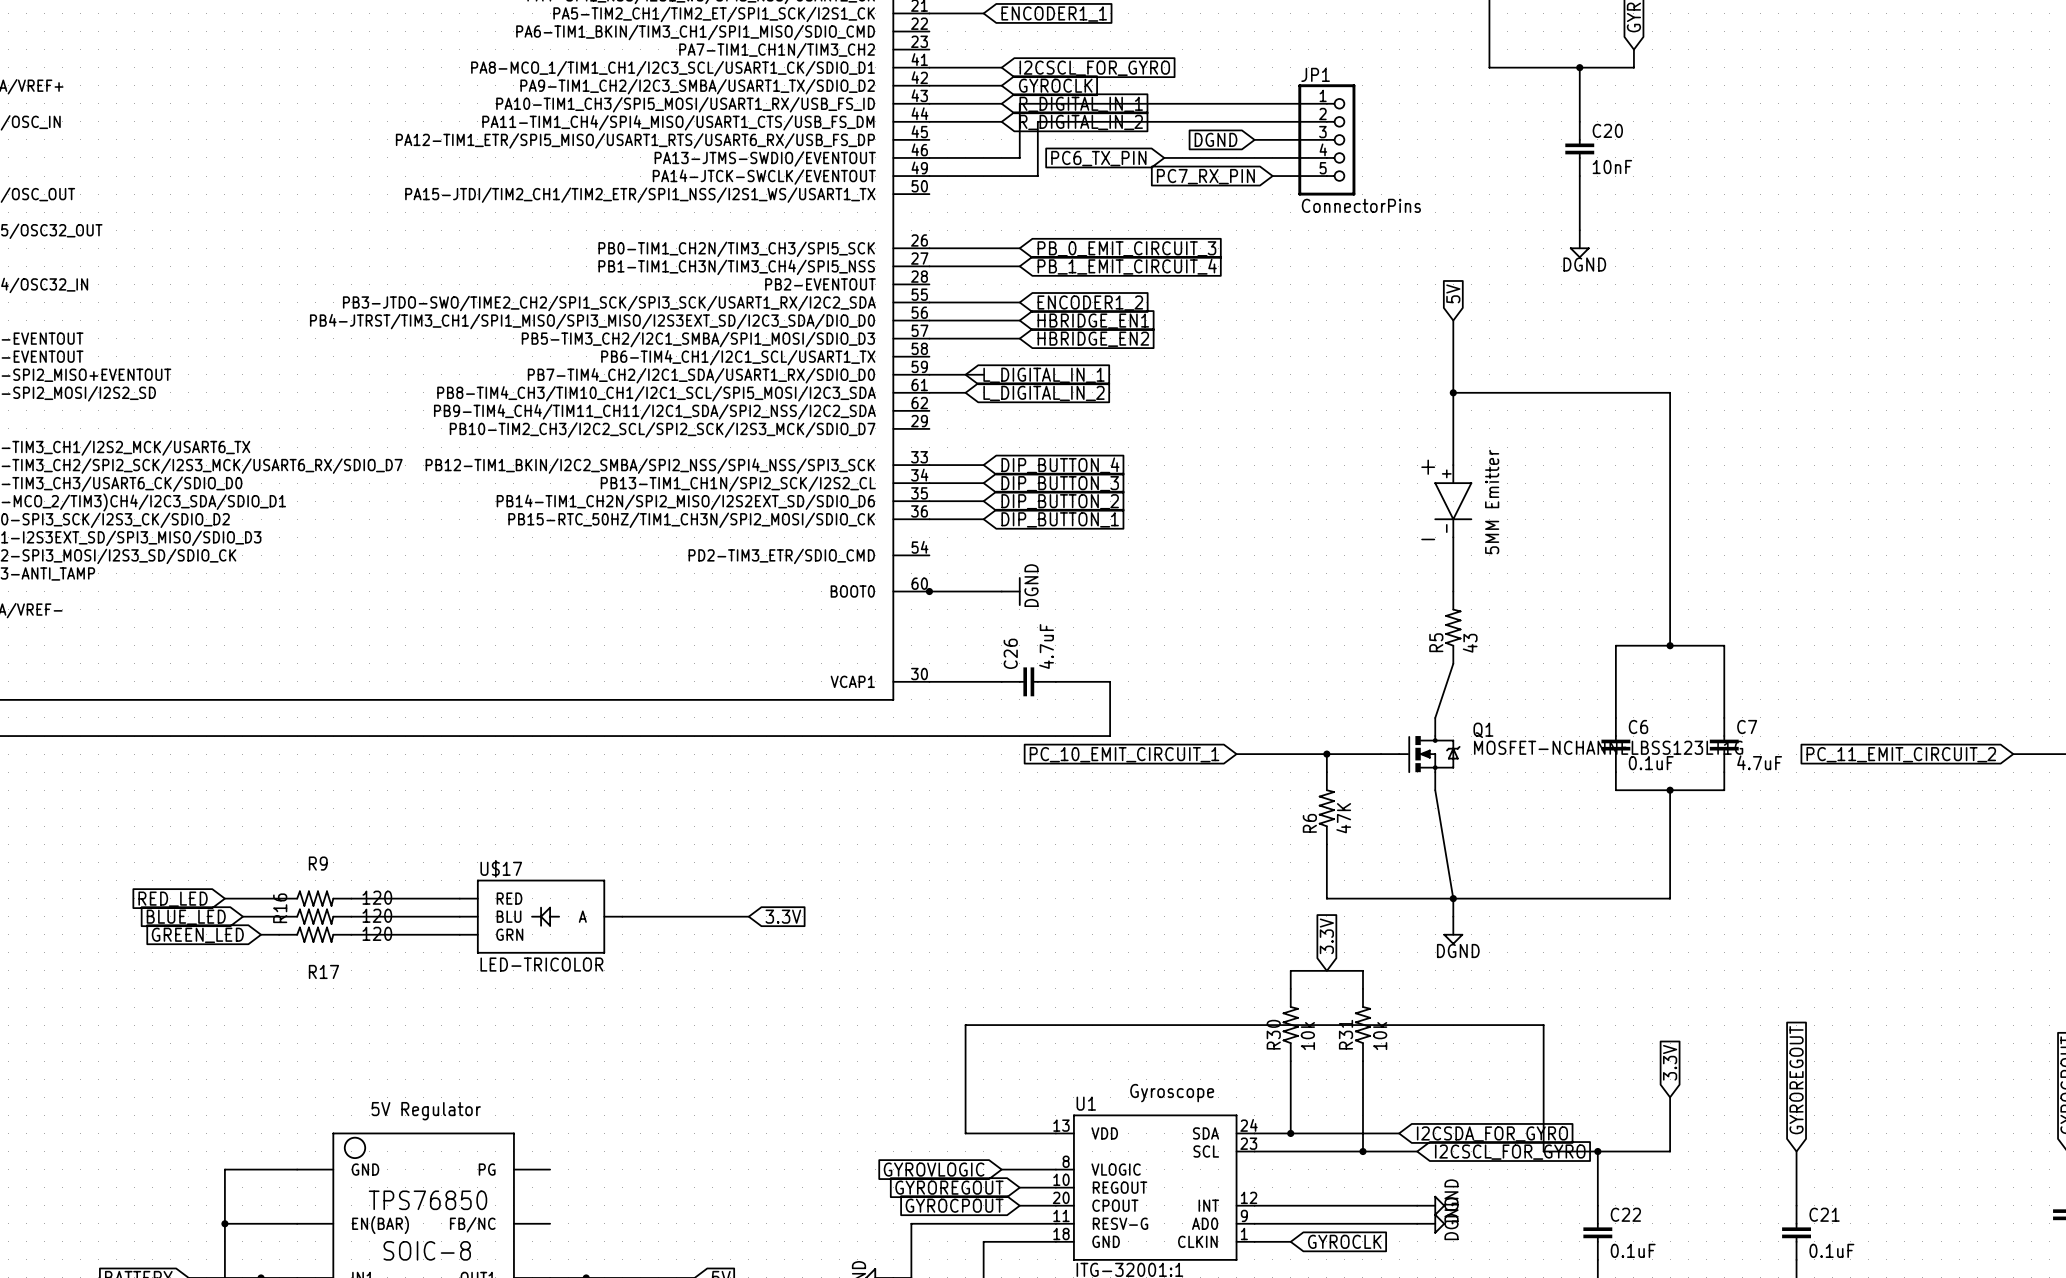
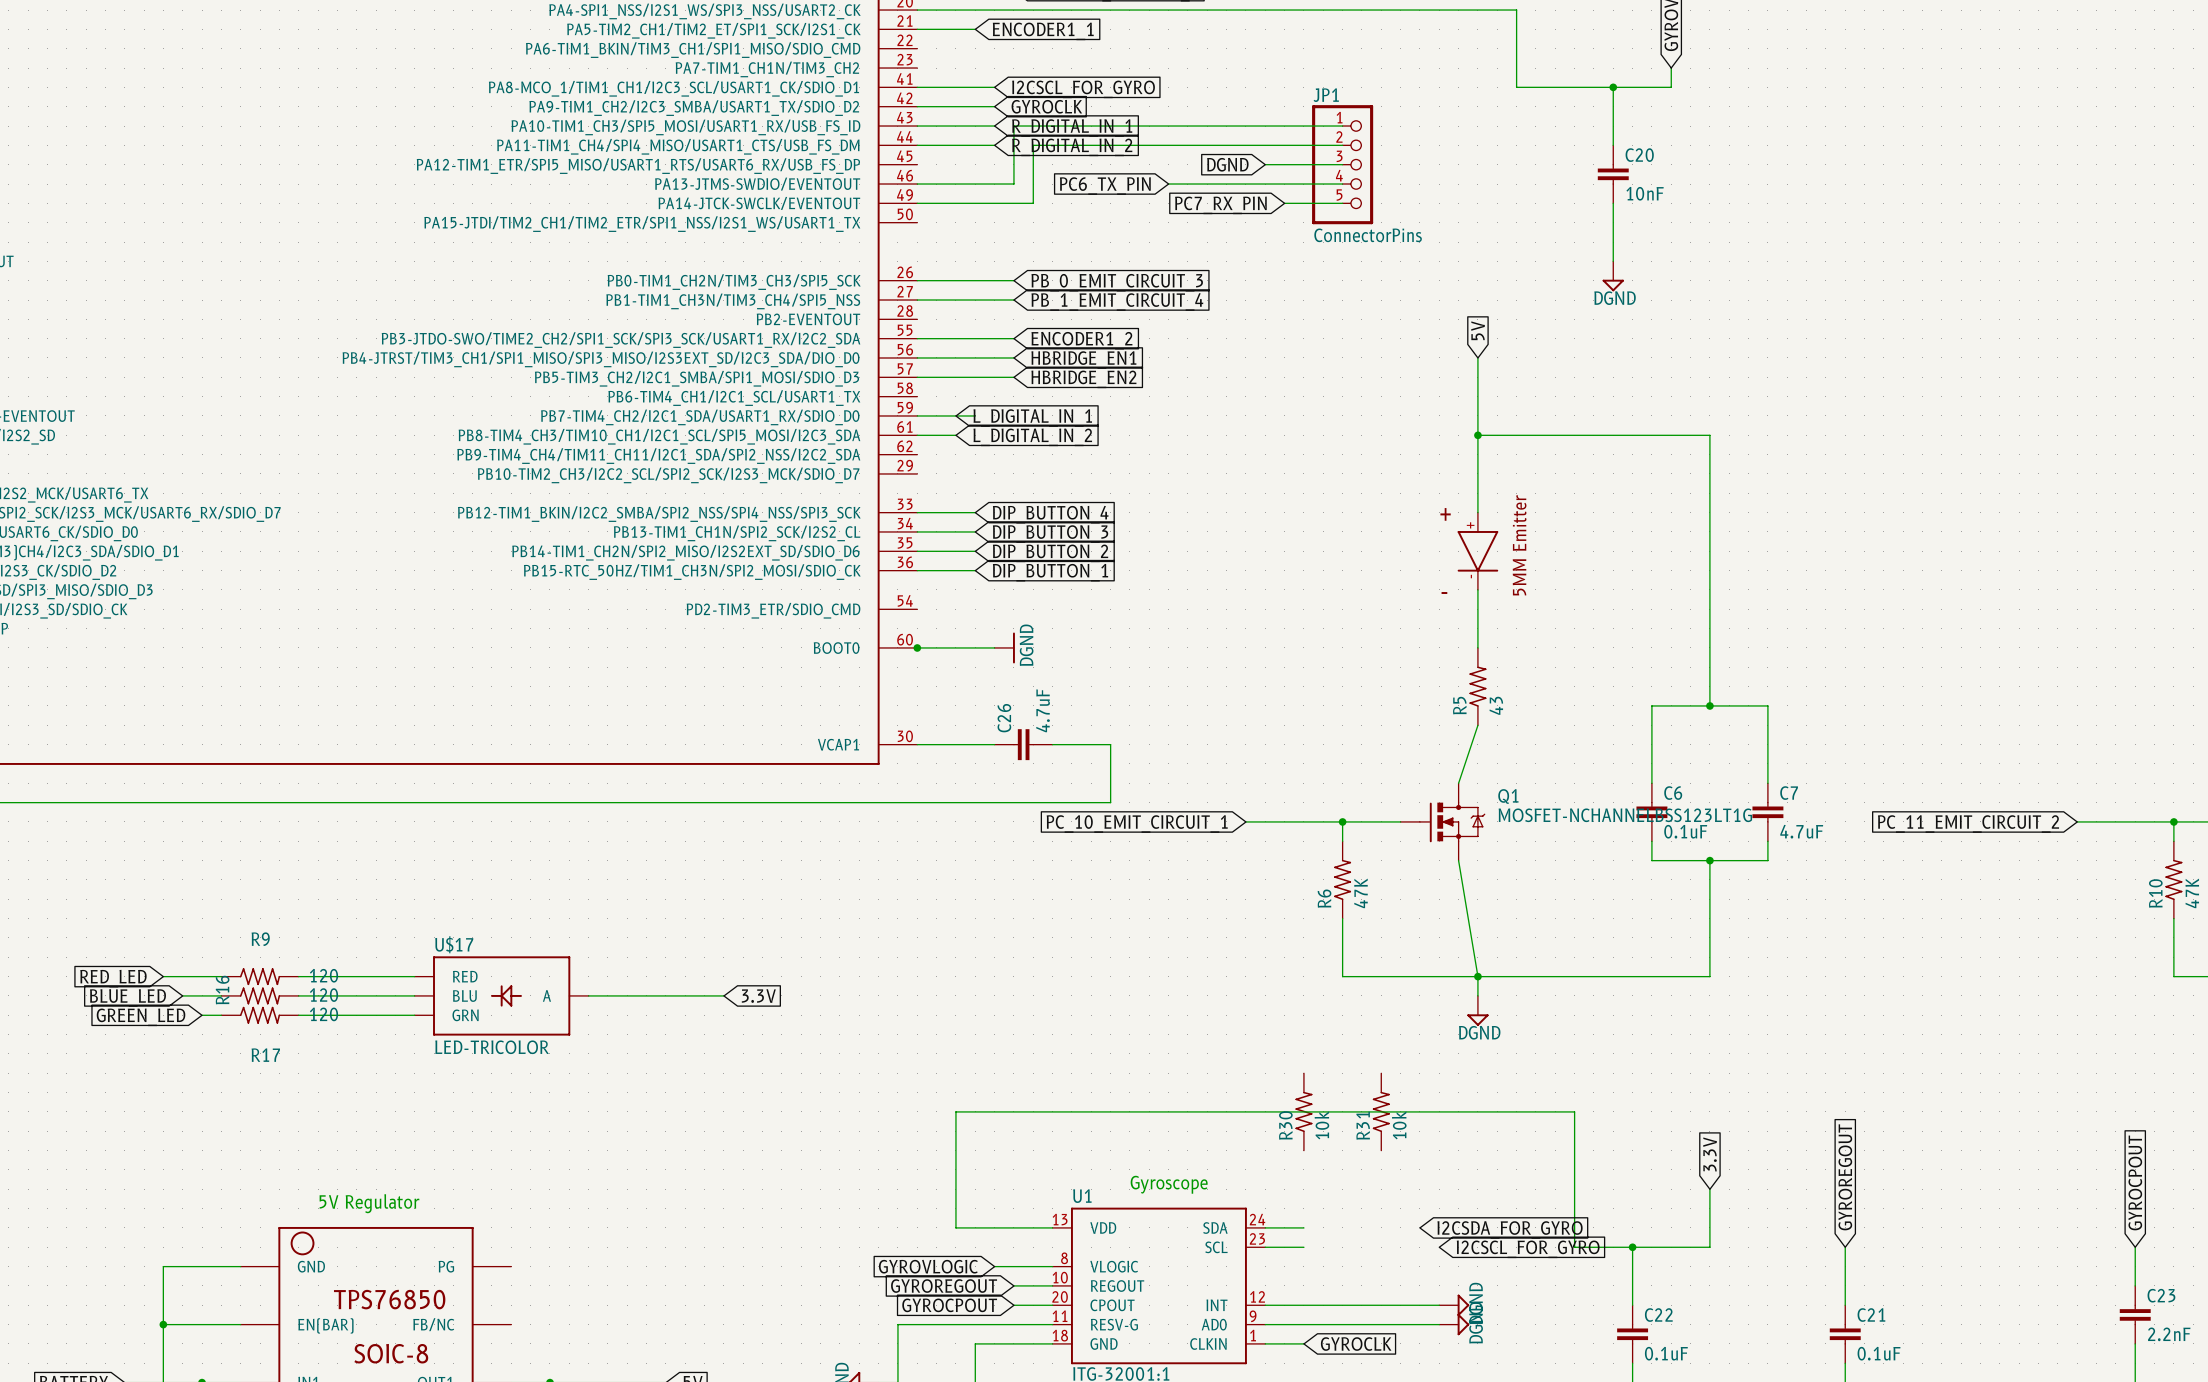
global label: 3.3V (1326, 936) -> none
wire: (1290, 988) (1290, 970) (1362, 970) (1362, 988) -> none
wire: (1290, 1061) (1290, 1133) (1399, 1133) -> none
wire: (1362, 1061) (1362, 1151) -> none
junction: (1290, 1133) -> none
wire: (1290, 1151) (1417, 1151) -> none
junction: (1362, 1151) -> none

